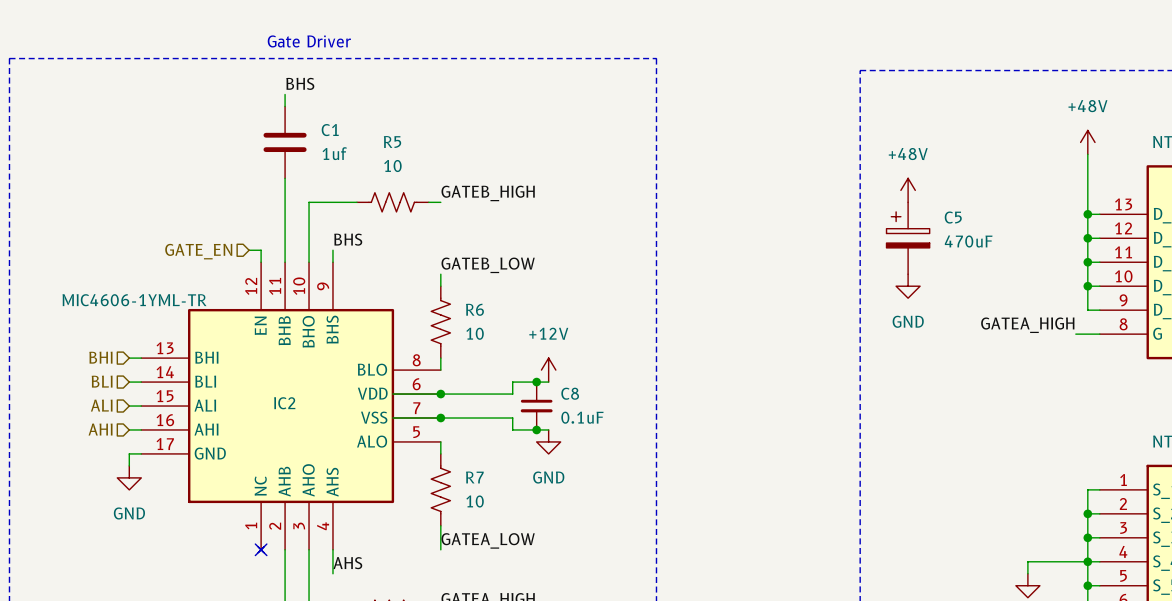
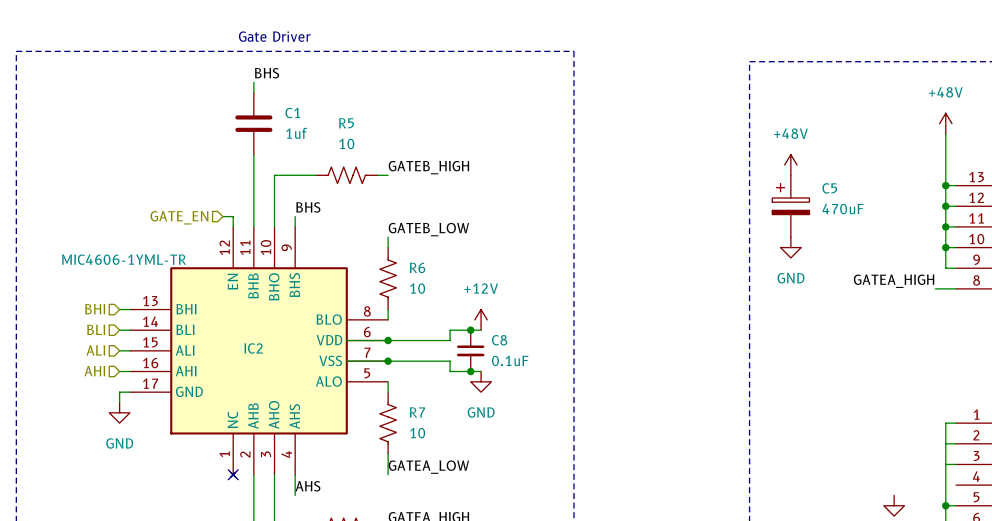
junction: (1087, 513) -> none
junction: (1087, 537) -> none
junction: (1087, 561) -> none
wire: (1099, 561) (1027, 561) (1027, 573) -> none

